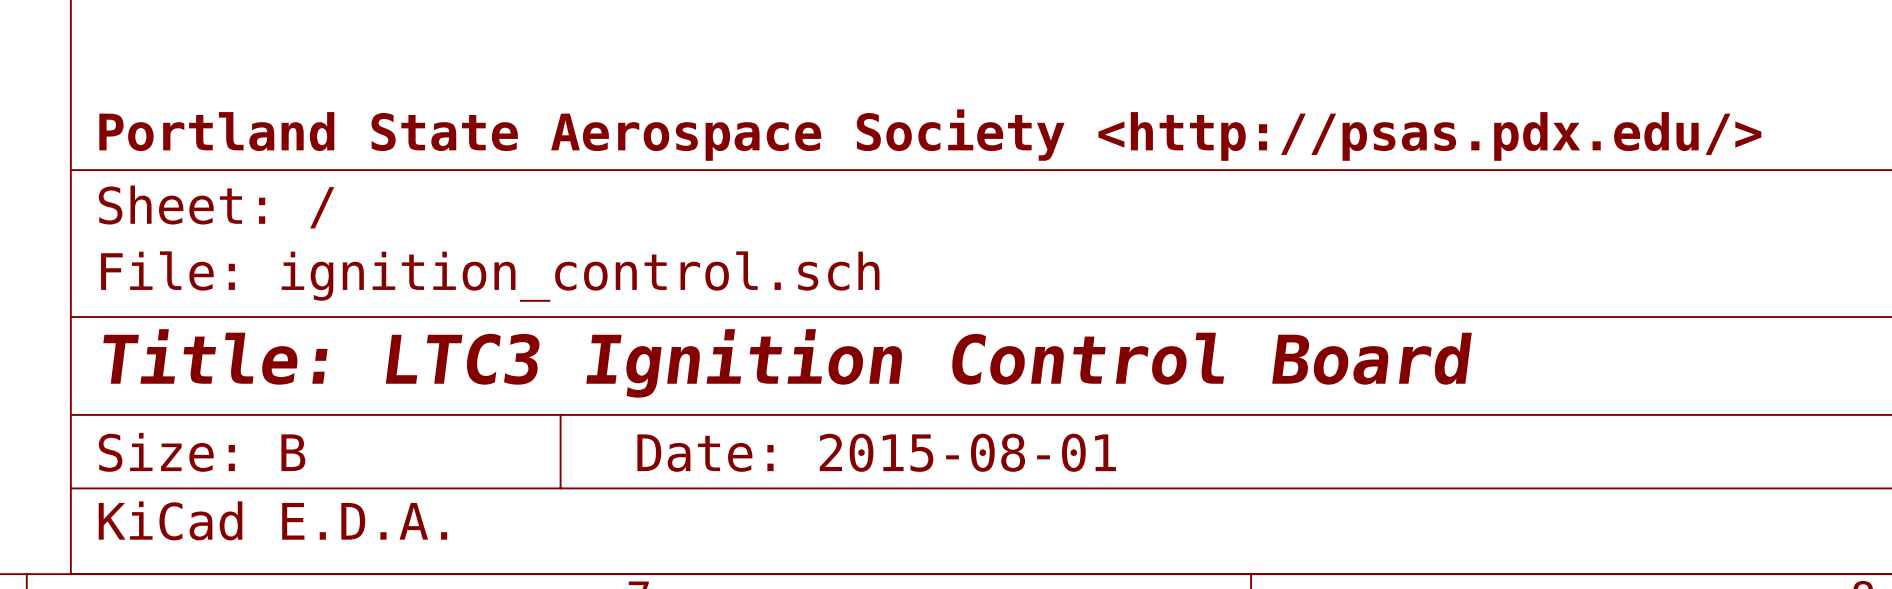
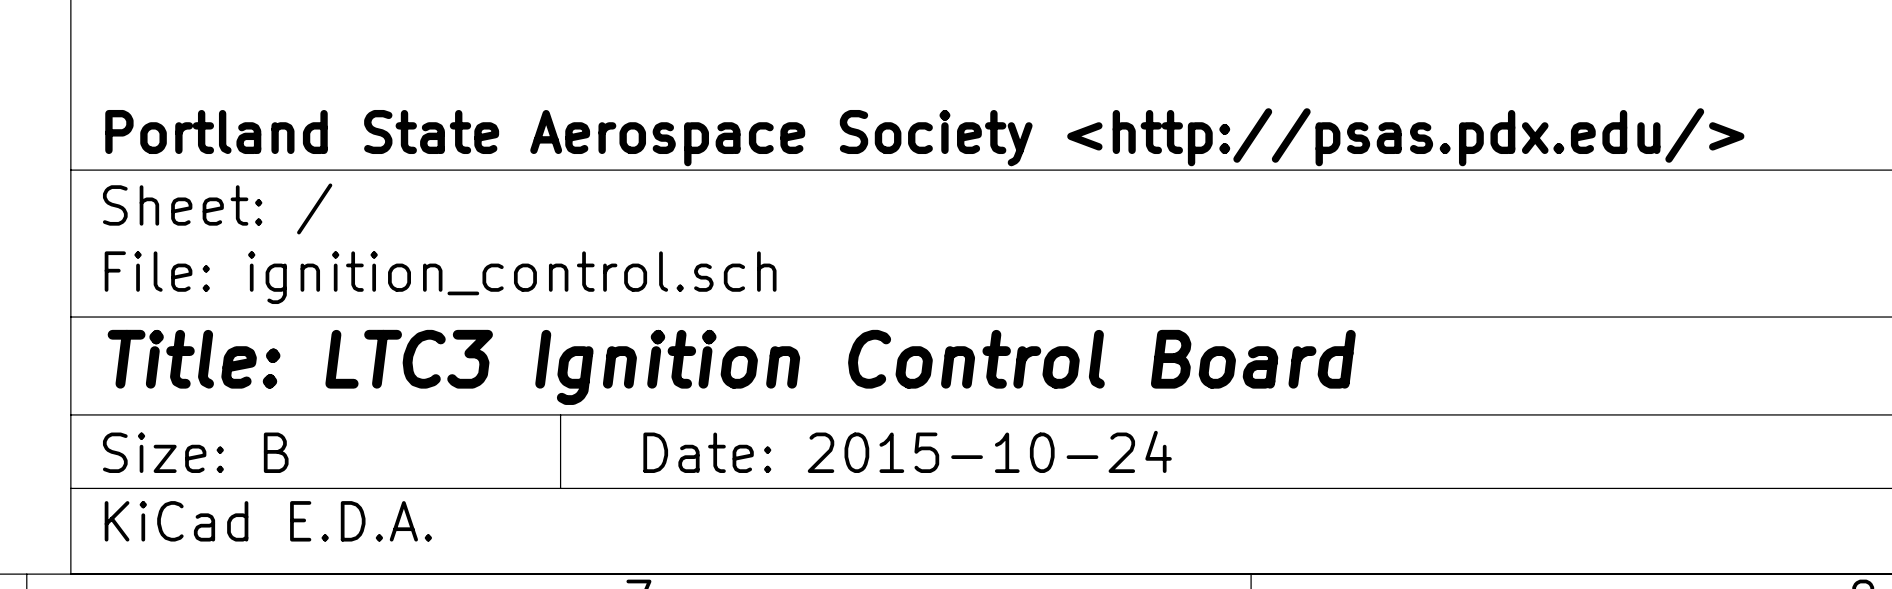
title block: Date: 2015-08-01 (876, 452) -> Date: 2015-10-24 (907, 451)

